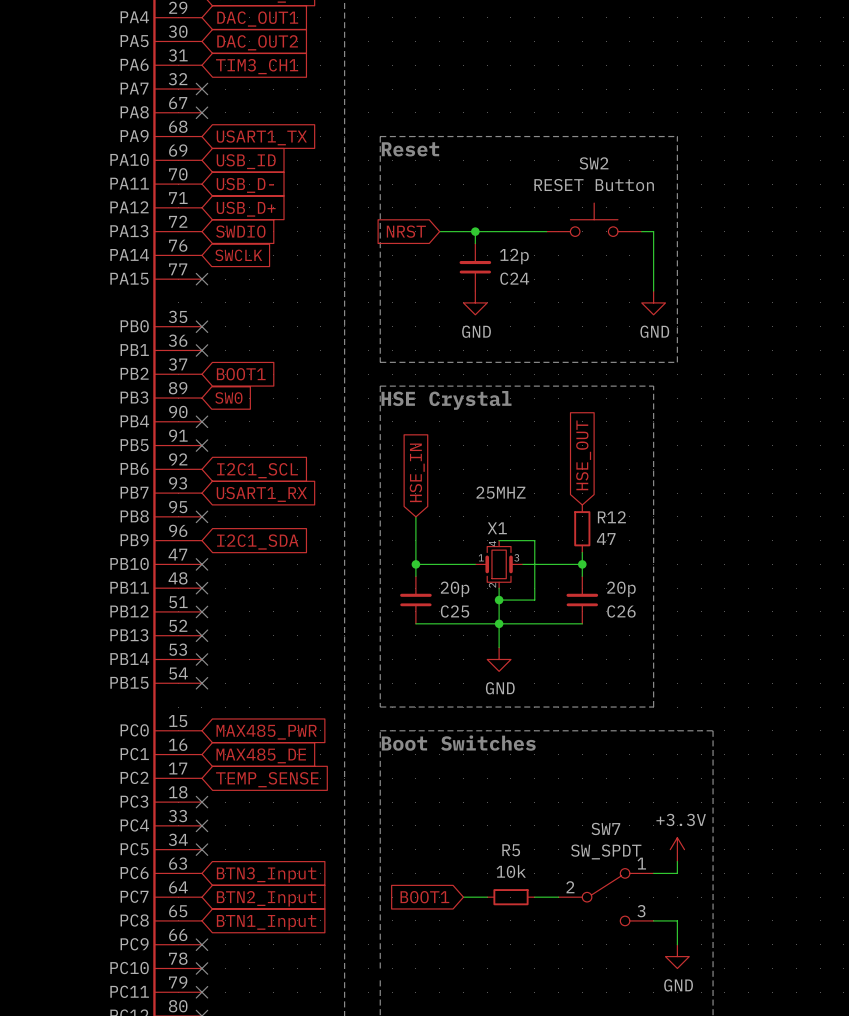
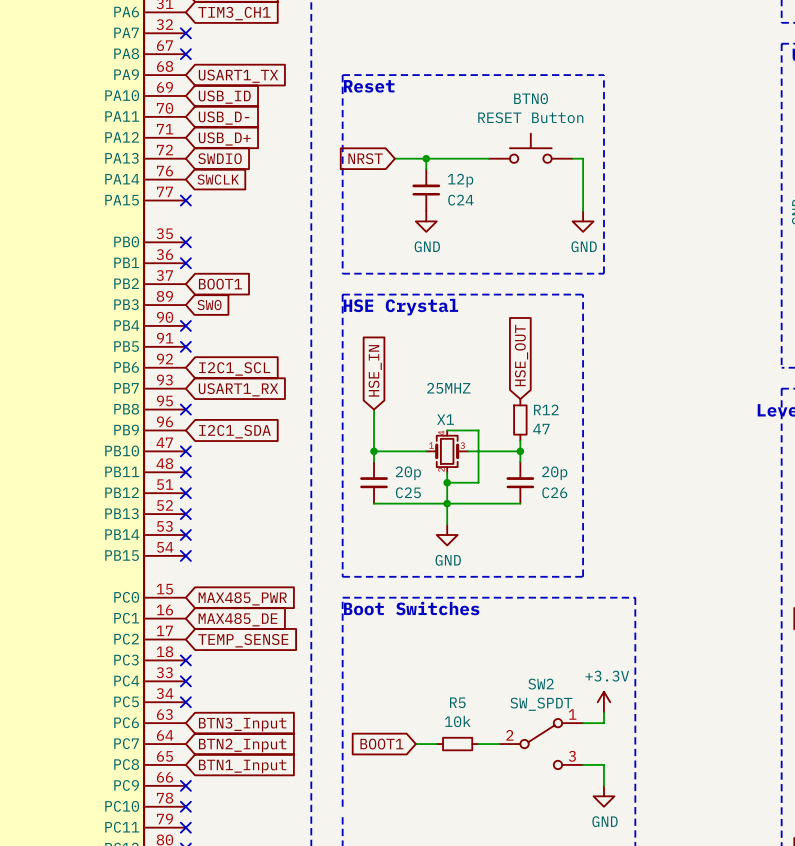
SW2 name: SW2 (594, 163) -> BTN0 (531, 98)
SW7 name: SW7 (605, 828) -> SW2 (541, 684)

